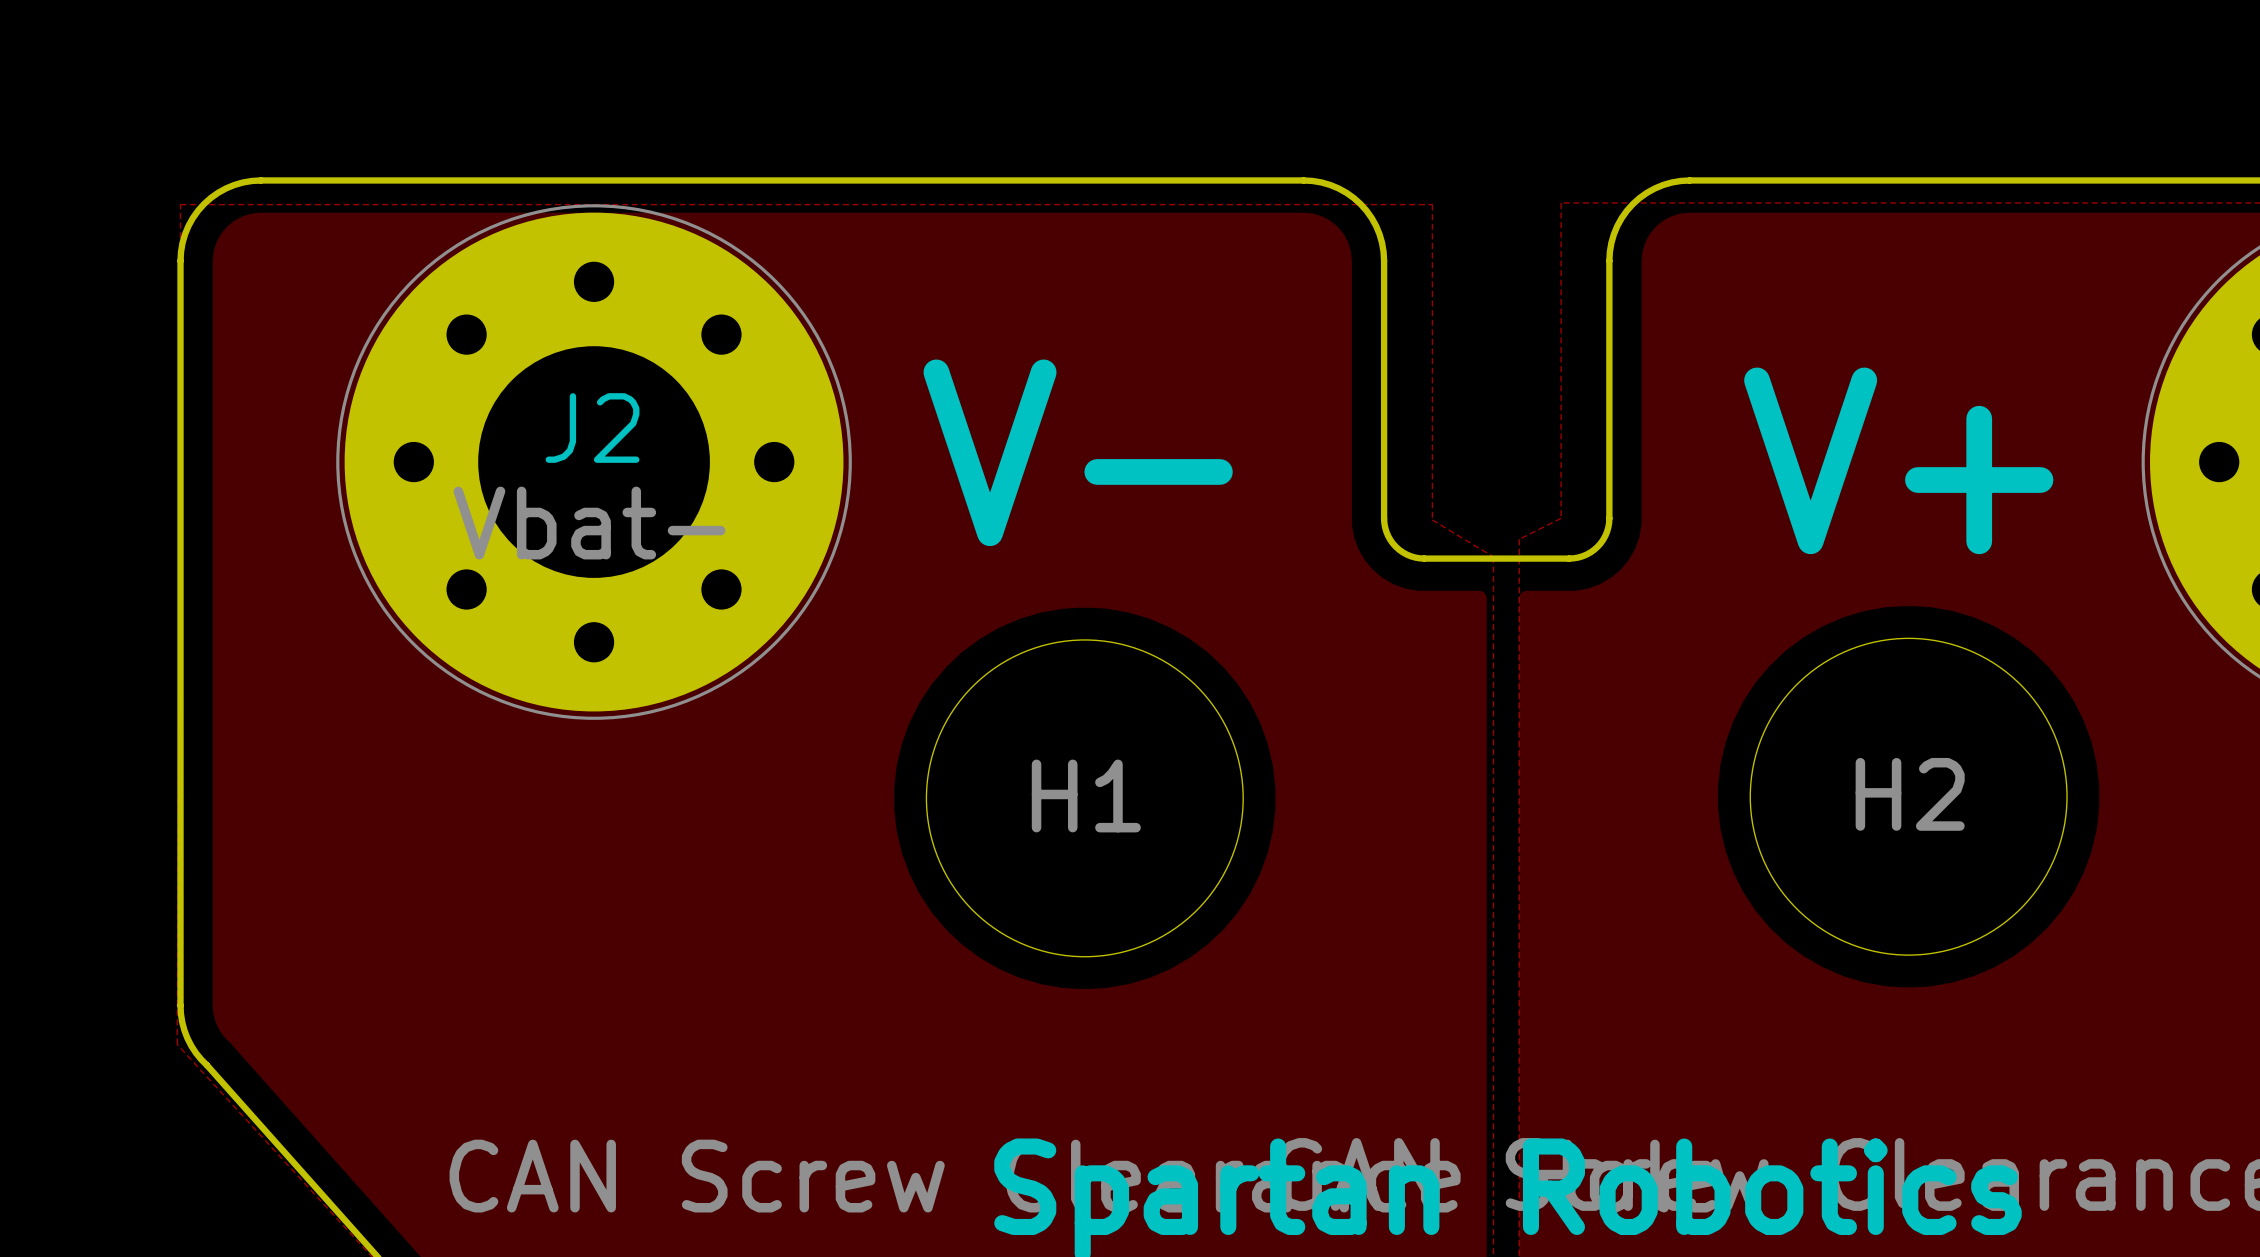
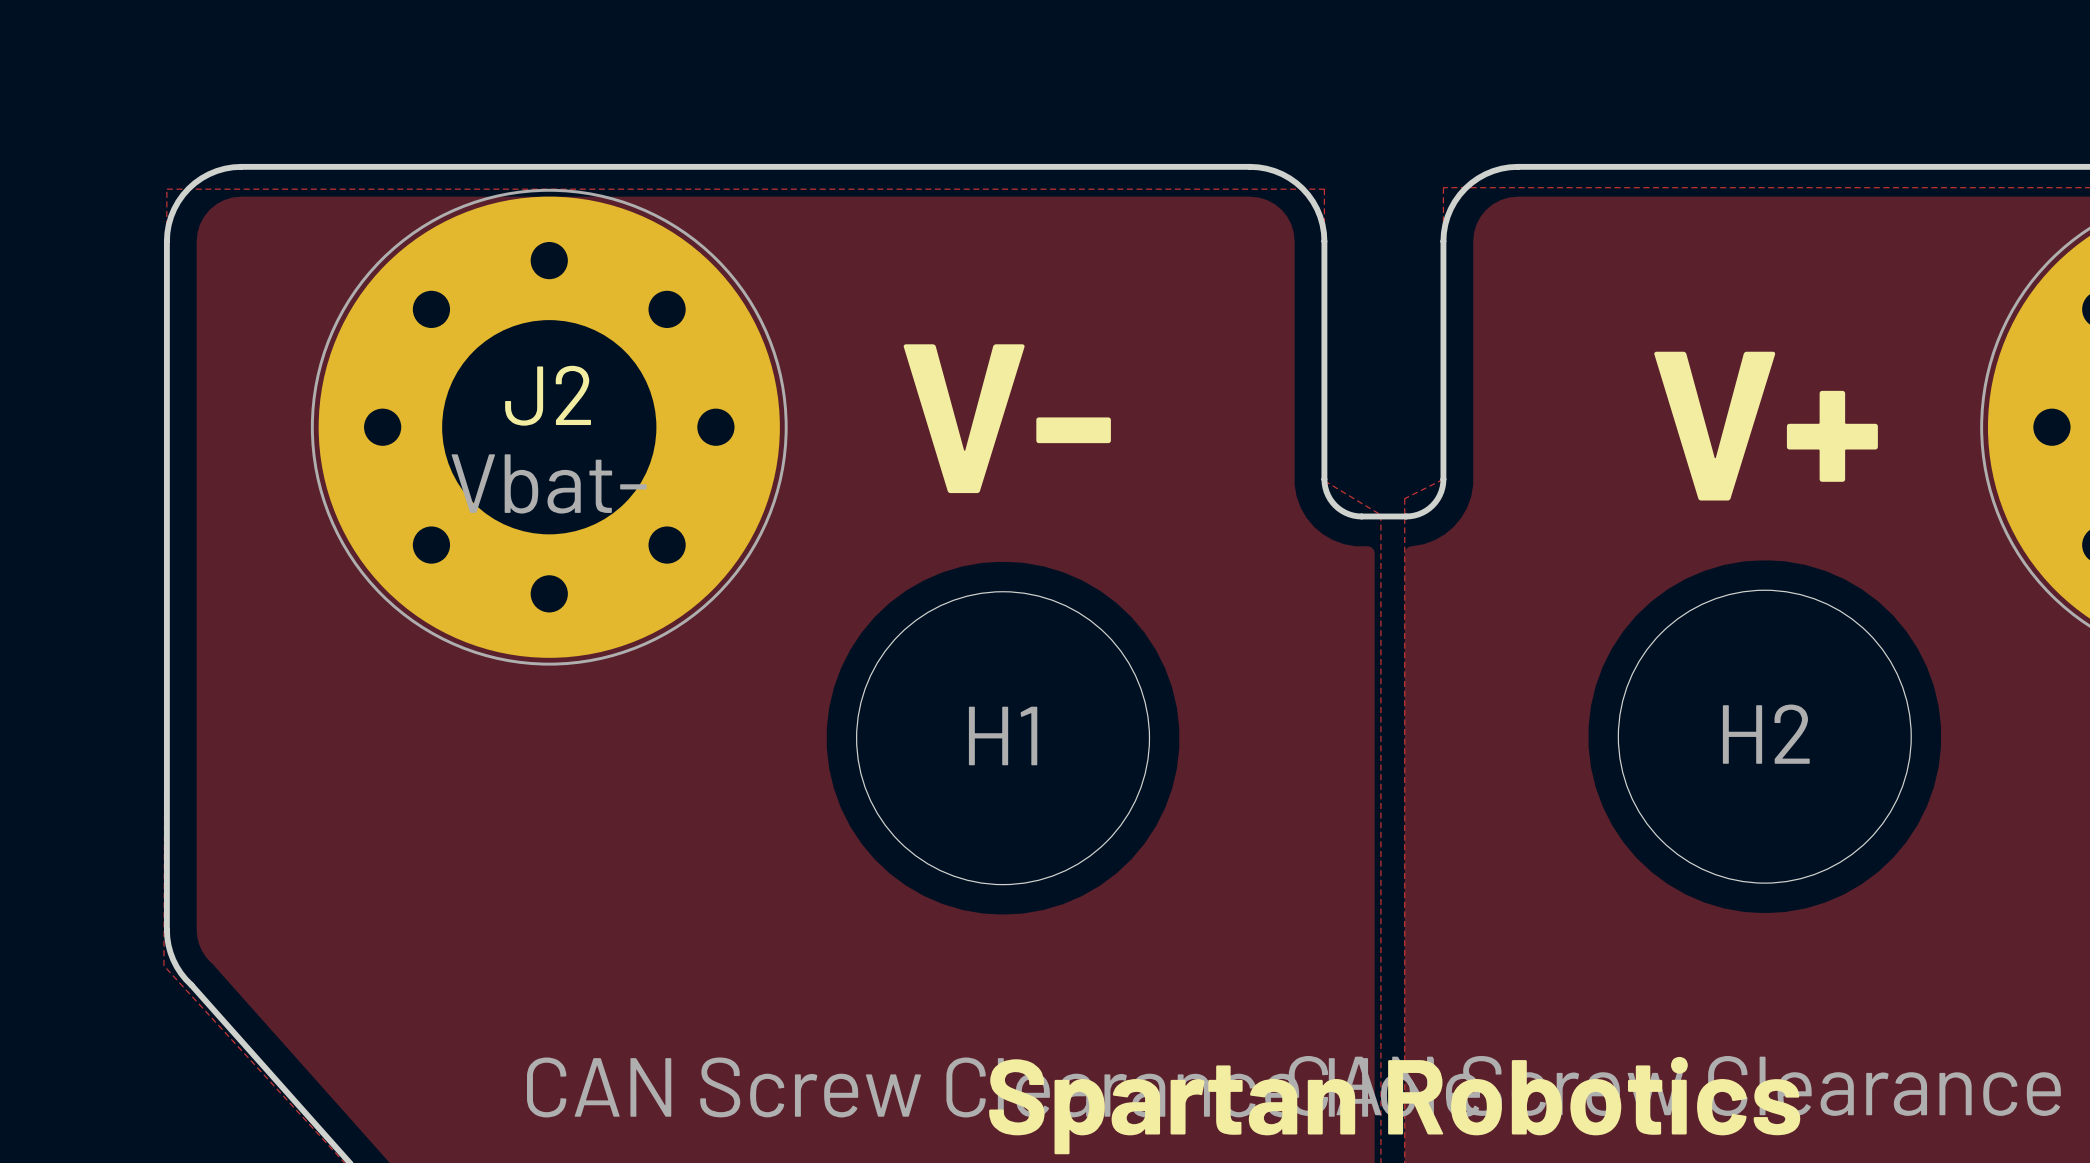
board edge: (1303, 180) (1330, 184) (1353, 198) (1371, 218) (1382, 243) (1384, 260) (1384, 518) (1388, 535) (1399, 549) (1415, 557) (1472, 558) -> (1205, 166) (1258, 167) (1274, 171) (1289, 178) (1302, 188) (1317, 208) (1322, 224) (1324, 241) (1324, 483) (1330, 499) (1338, 508) (1349, 514) (1361, 516)
board edge: (1689, 180) (1663, 184) (1639, 198) (1621, 218) (1611, 243) (1609, 260) (1609, 518) (1605, 535) (1594, 549) (1578, 557) (1520, 558) -> (1562, 166) (1509, 167) (1493, 171) (1478, 178) (1465, 188) (1450, 208) (1445, 224) (1443, 241) (1443, 483) (1439, 495) (1432, 505) (1422, 512) (1406, 516)

